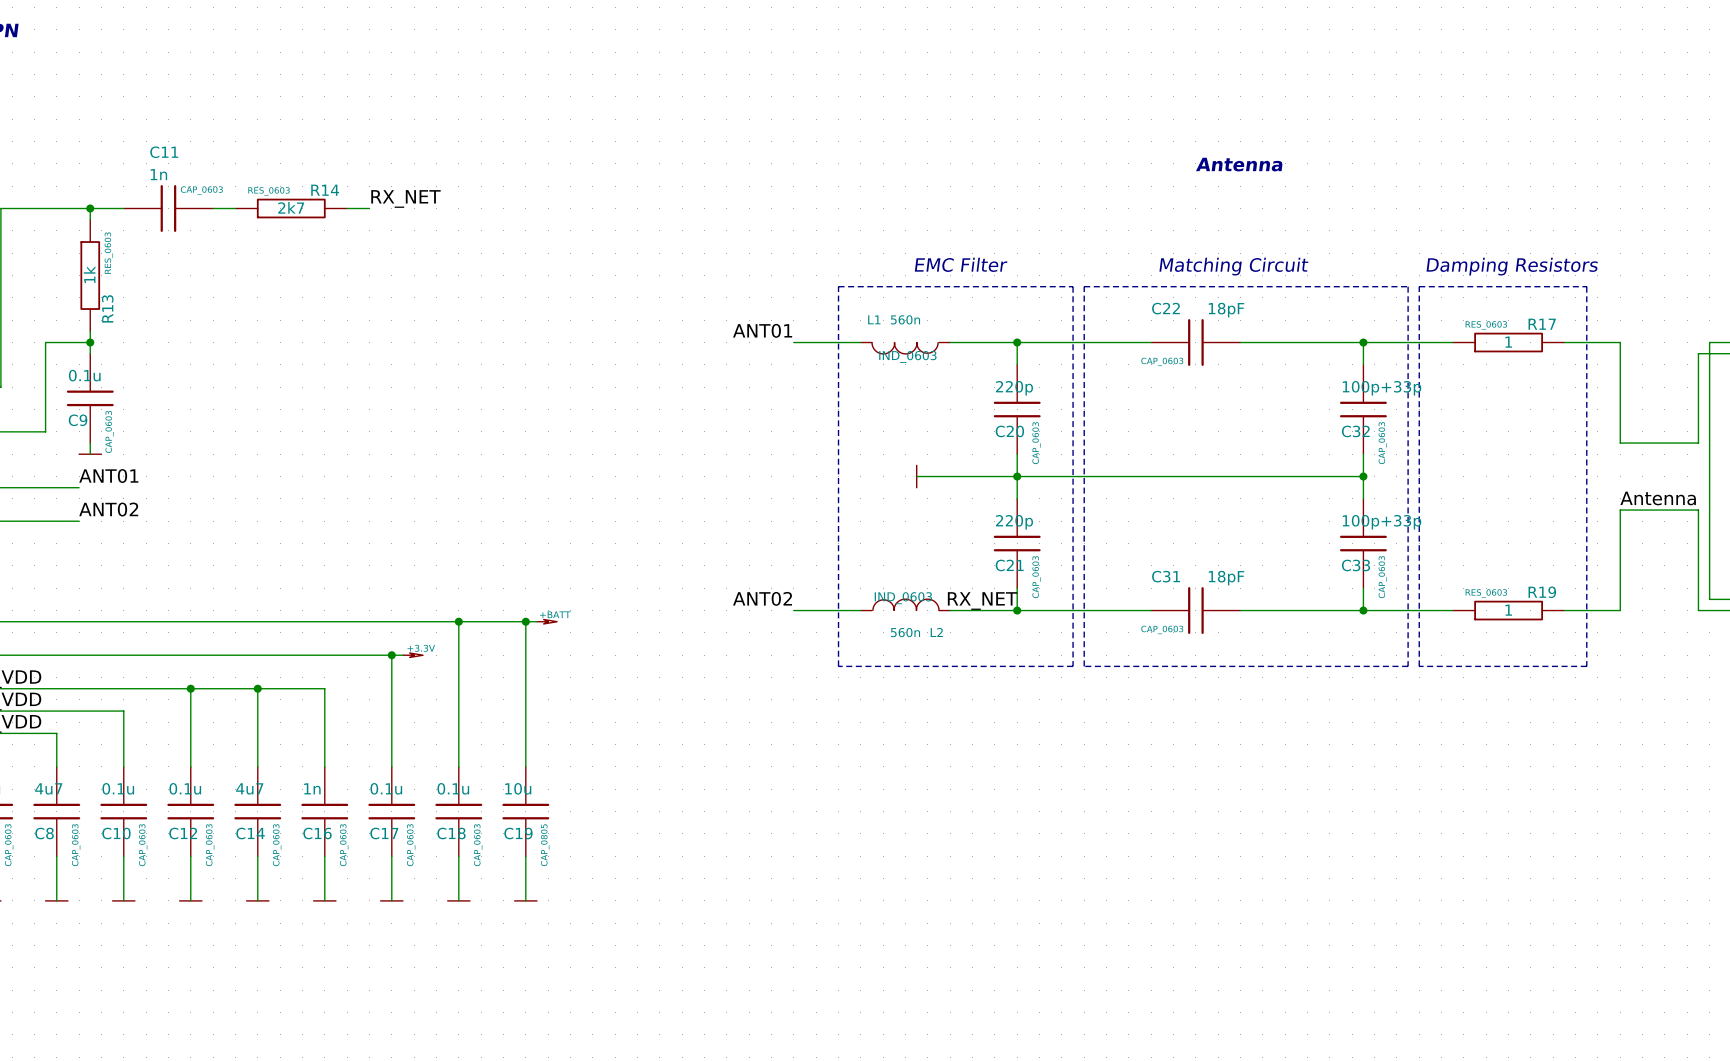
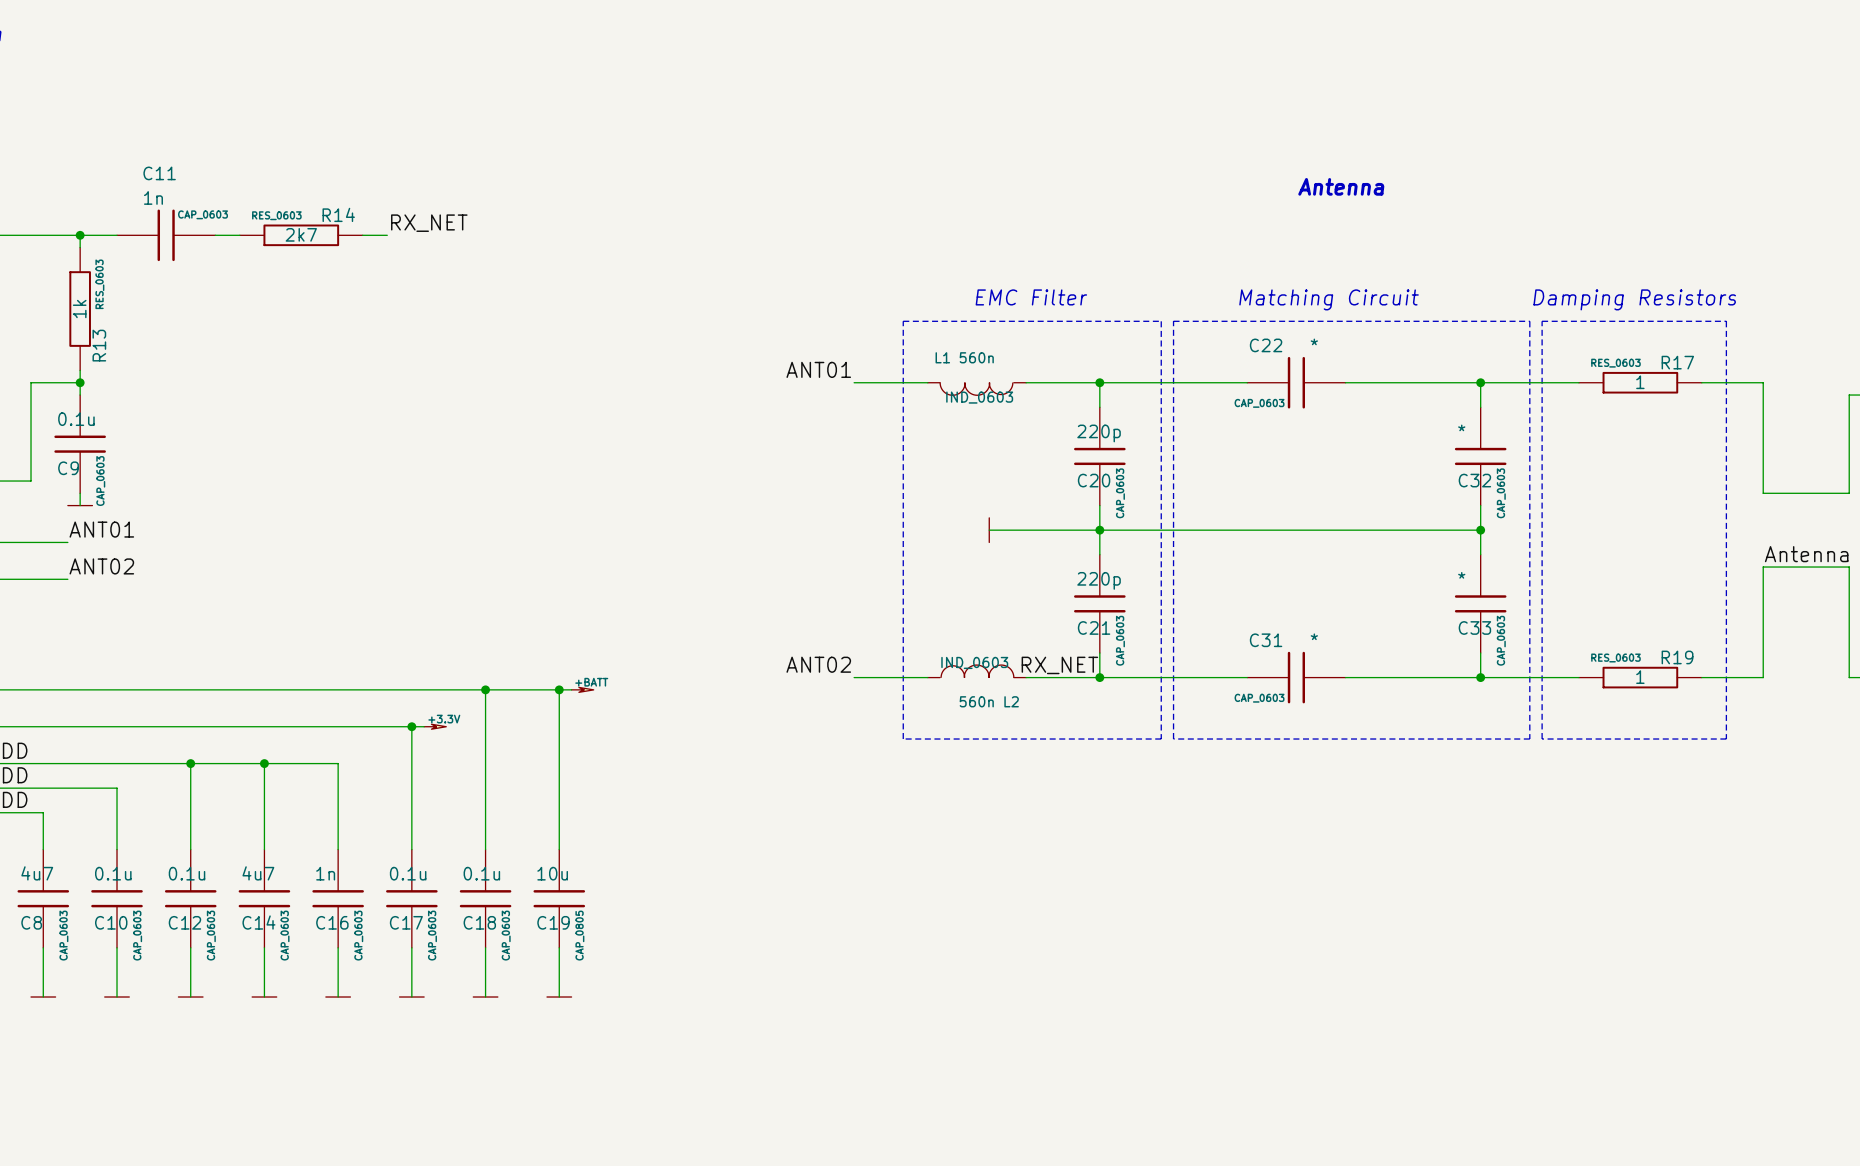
C22 value: 18pF (1226, 310) -> * (1314, 341)
C32 value: 100p+33p (1382, 388) -> * (1461, 427)
C33 value: 100p+33p (1382, 522) -> * (1461, 575)
C31 value: 18pF (1226, 578) -> * (1314, 636)

